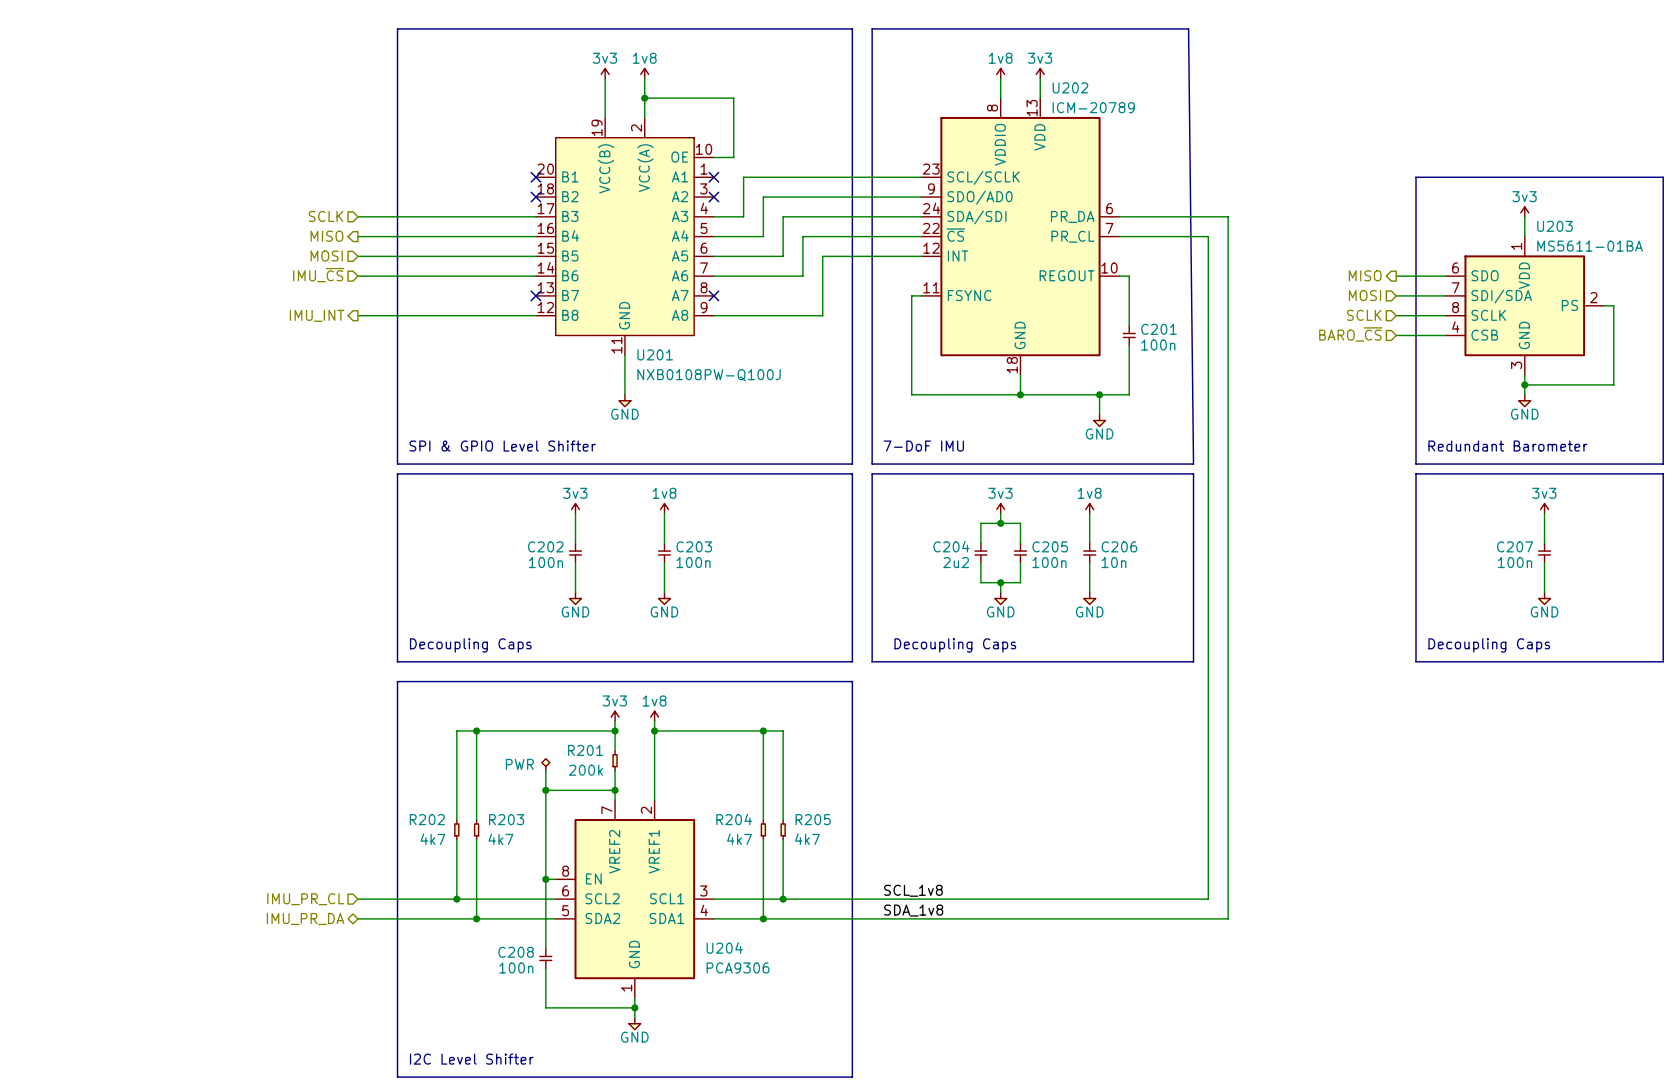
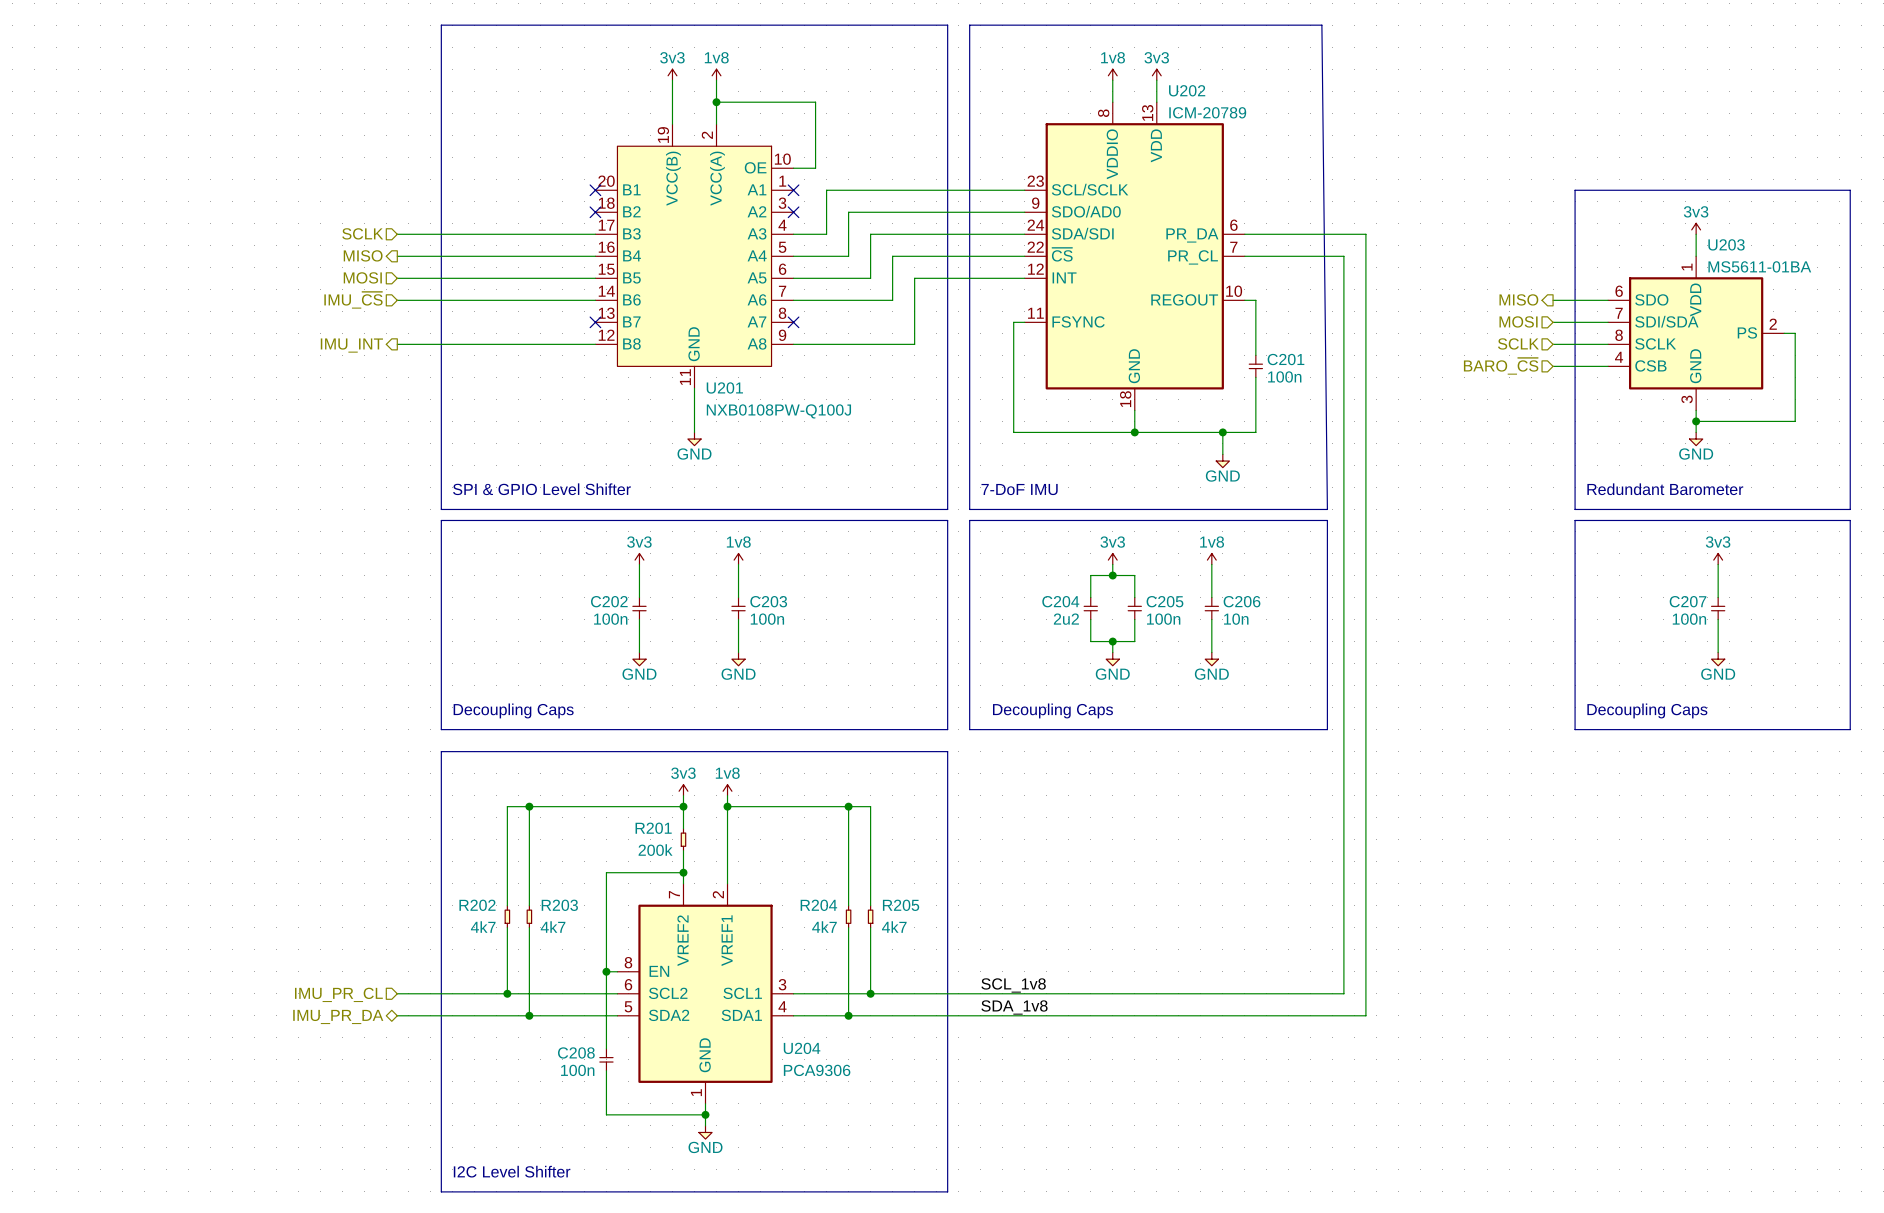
power symbol: PWR (545, 764) -> none
wire: (545, 770) (545, 790) -> none
junction: (545, 790) -> none

